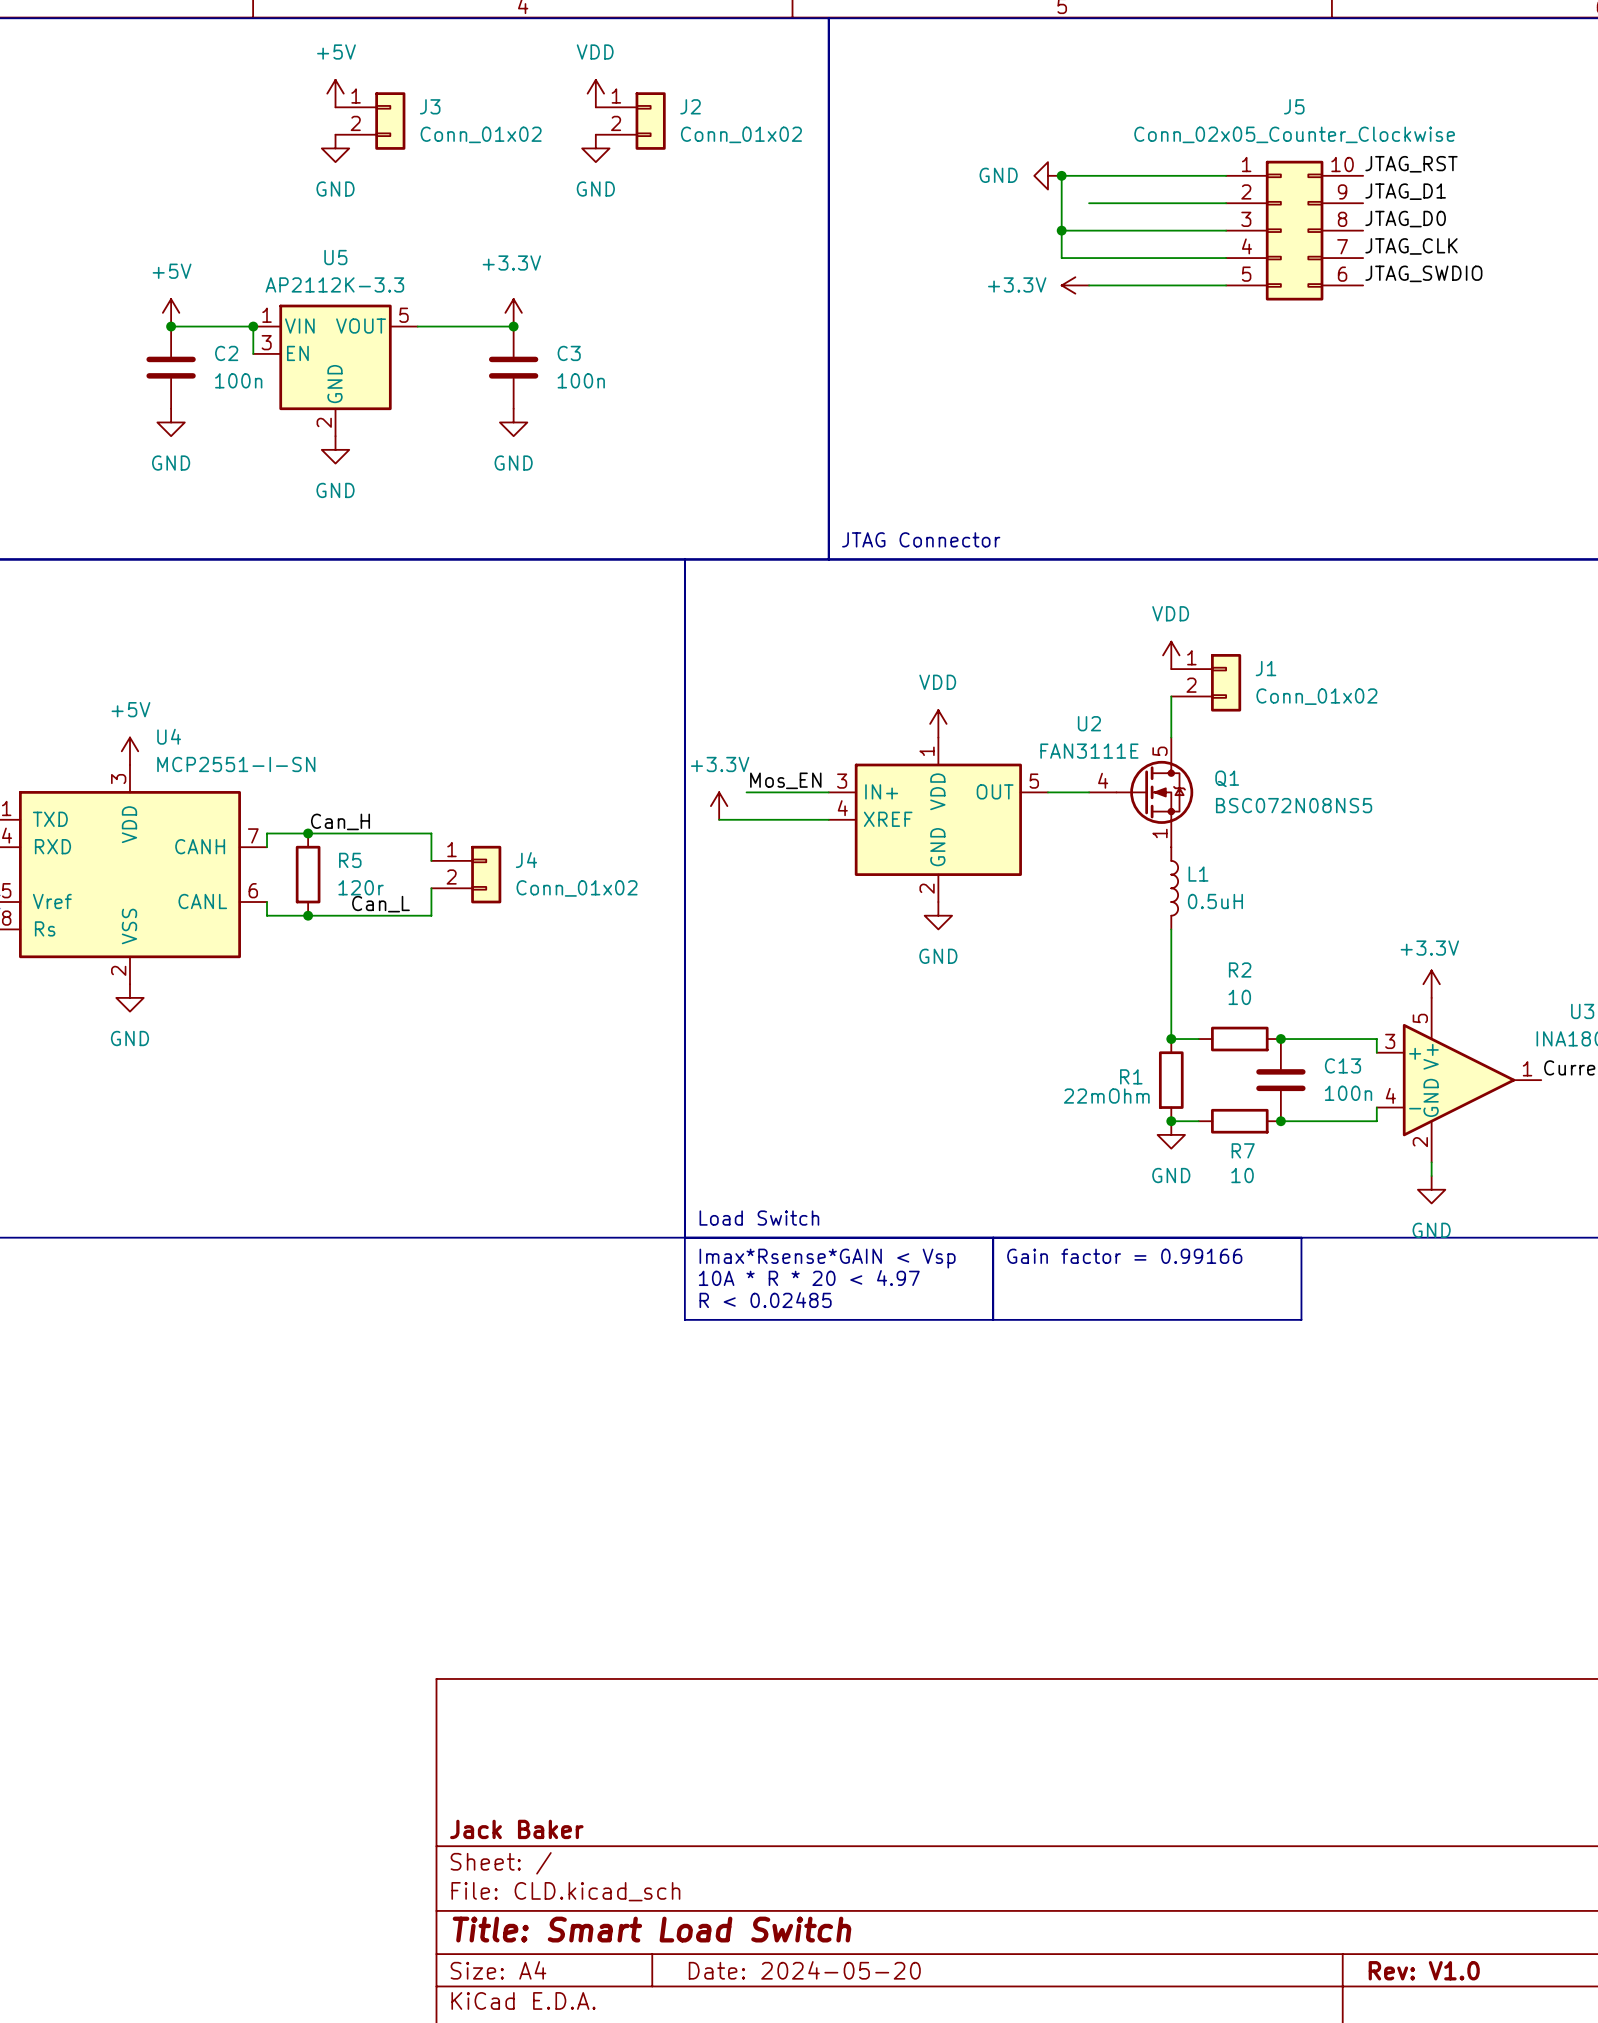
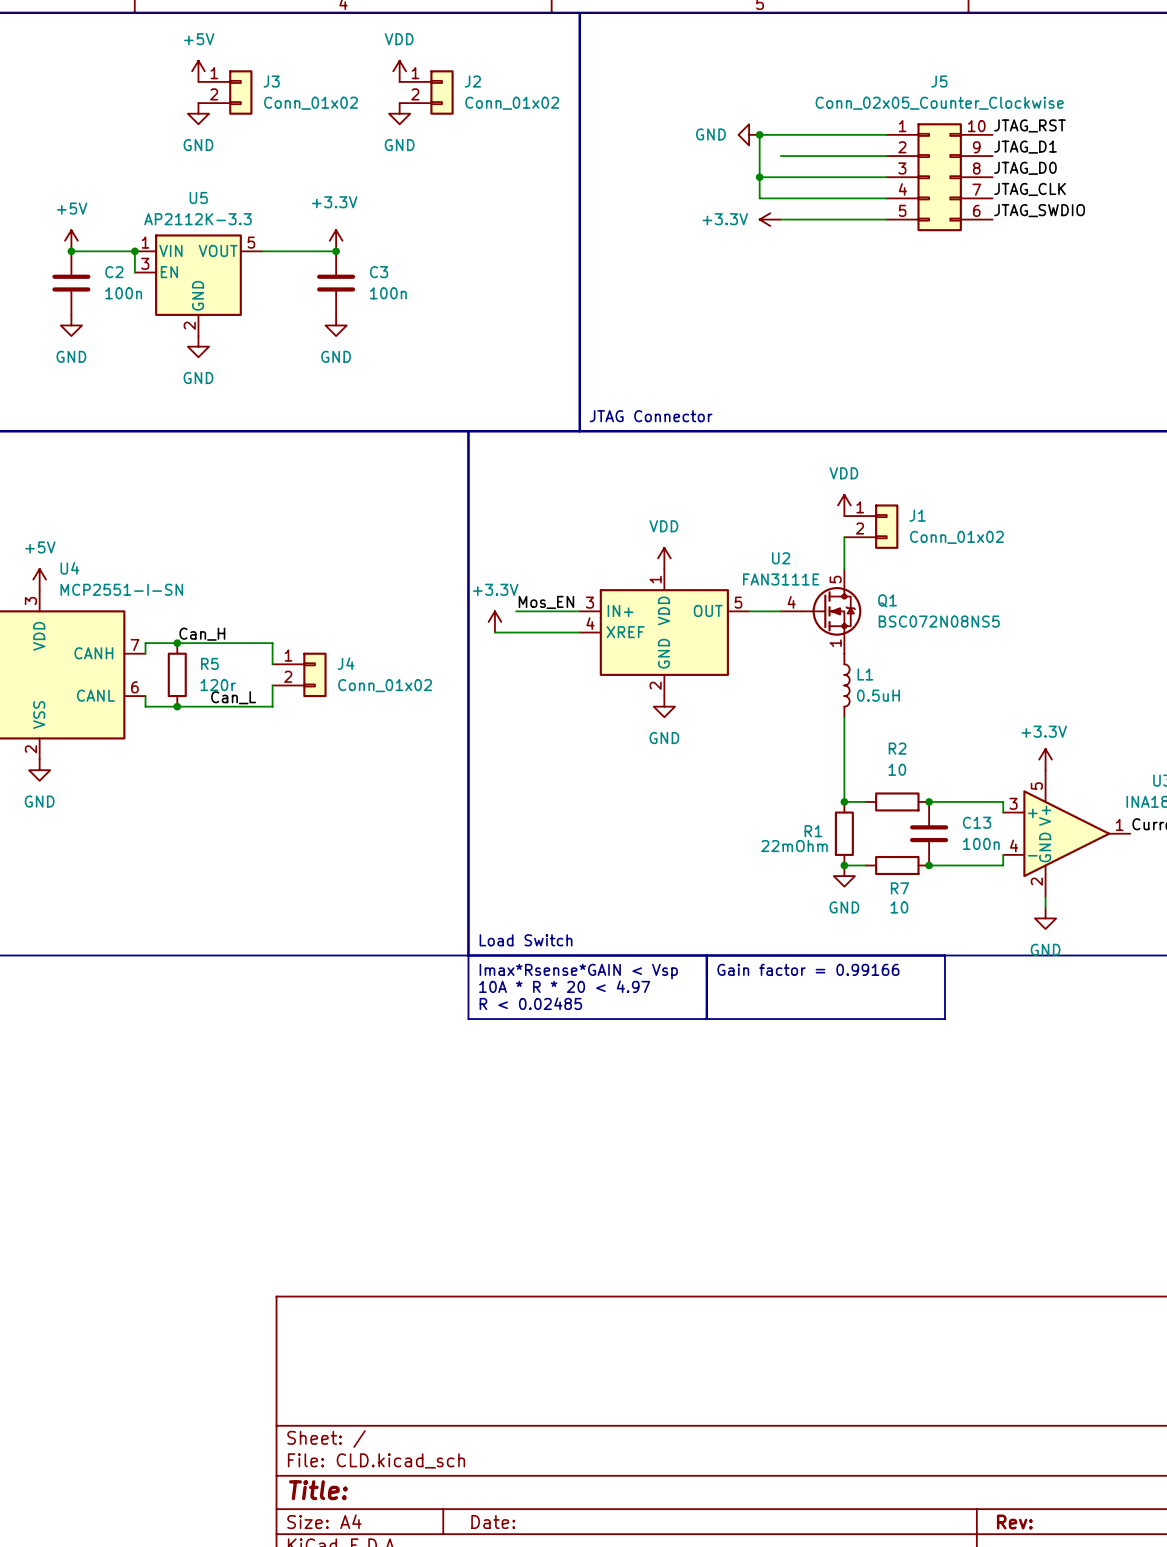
title block: Jack Baker (516, 1829) -> none
title block: Title: Smart Load Switch (652, 1929) -> Title: (318, 1490)
title block: Date: 2024-05-20 (804, 1970) -> Date: (493, 1522)
title block: Rev: V1.0 (1424, 1970) -> Rev: (1014, 1522)

